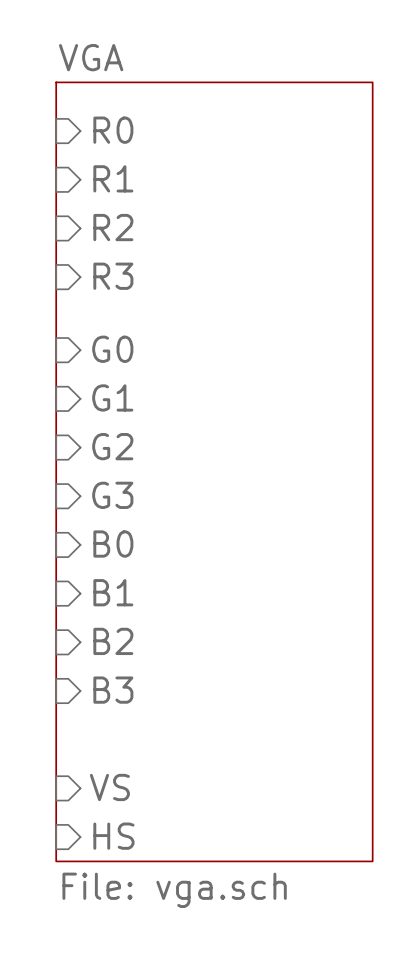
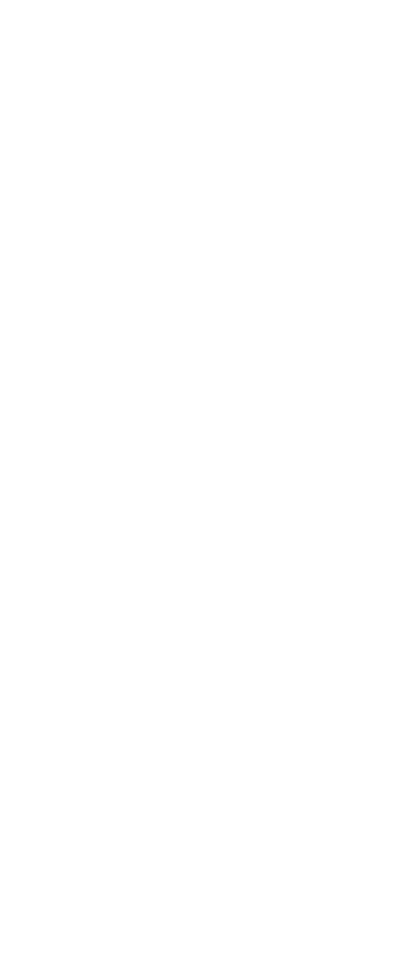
sheet pin: R0 (113, 130) -> none
sheet pin: R1 (113, 178) -> none
sheet pin: R2 (113, 227) -> none
sheet pin: R3 (113, 276) -> none
sheet pin: G0 (112, 349) -> none
sheet pin: G1 (112, 397) -> none
sheet pin: G2 (112, 446) -> none
sheet VGA: File: vga.sch (214, 471) -> none
sheet pin: G3 (112, 495) -> none
sheet pin: B0 (113, 544) -> none
sheet pin: B1 (113, 592) -> none
sheet pin: B2 (113, 641) -> none
sheet pin: B3 (113, 690) -> none
sheet pin: VS (109, 787) -> none
sheet pin: HS (113, 836) -> none

